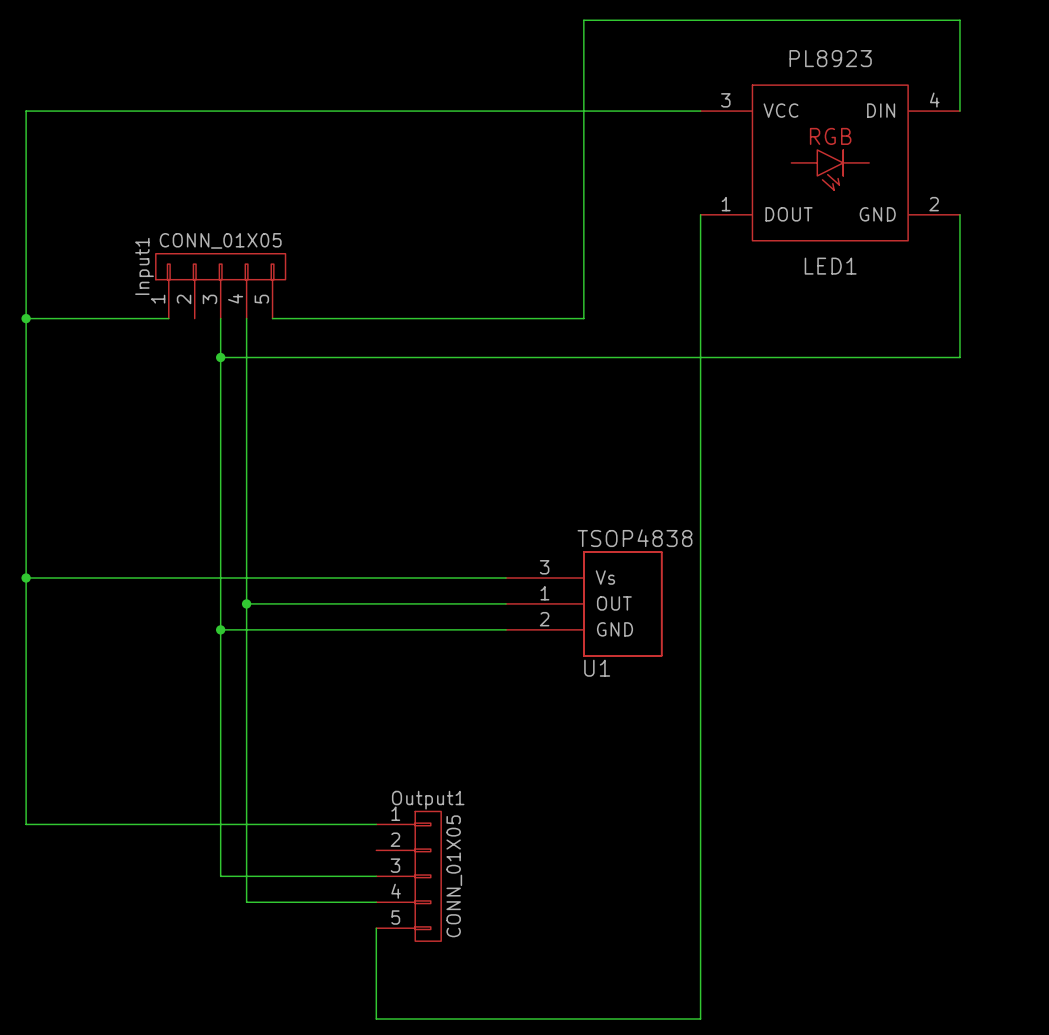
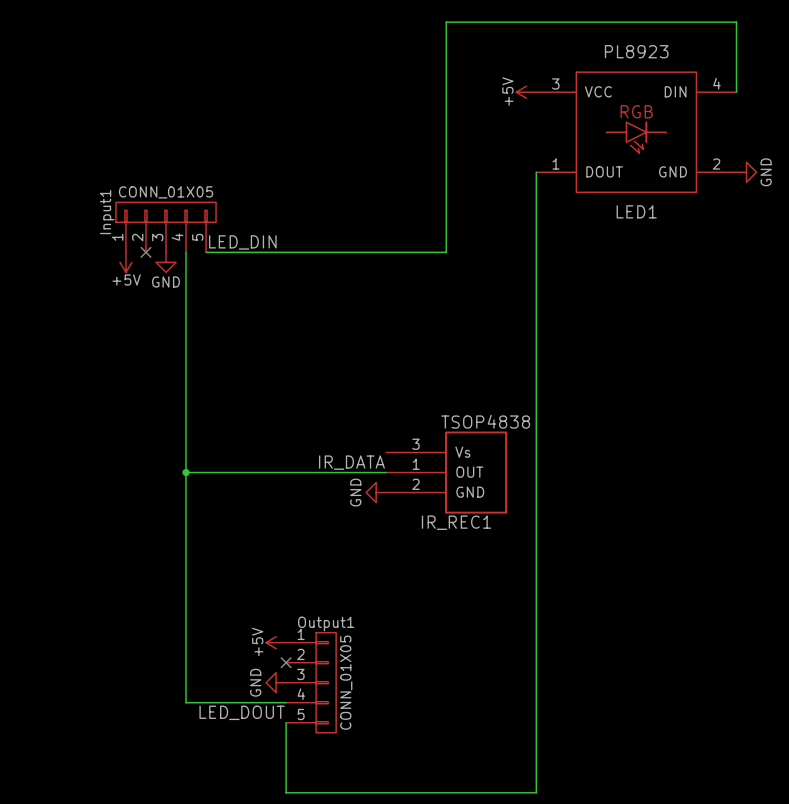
power symbol: none -> +5V (526, 92)
wire: (700, 111) (26, 111) (26, 824) (376, 824) -> none
wire: (959, 214) (959, 357) (220, 357) -> none
power symbol: none -> GND (746, 172)
label: none -> LED_DIN (242, 242)
wire: (26, 318) (168, 318) -> none
junction: (26, 318) -> none
no-connect mark: none -> (145, 252)
wire: (220, 318) (220, 876) (376, 876) -> none
power symbol: none -> +5V (125, 262)
power symbol: none -> GND (165, 262)
junction: (220, 357) -> none
wire: (26, 578) (506, 578) -> none
junction: (26, 578) -> none
label: none -> IR_DATA (351, 462)
wire: (220, 629) (506, 629) -> none
junction: (220, 629) -> none
power symbol: none -> GND (376, 492)
U1 name: U1 (597, 668) -> IR_REC1 (456, 522)
power symbol: none -> +5V (276, 642)
no-connect mark: none -> (286, 662)
power symbol: none -> GND (276, 682)
label: none -> LED_DOUT (242, 712)

